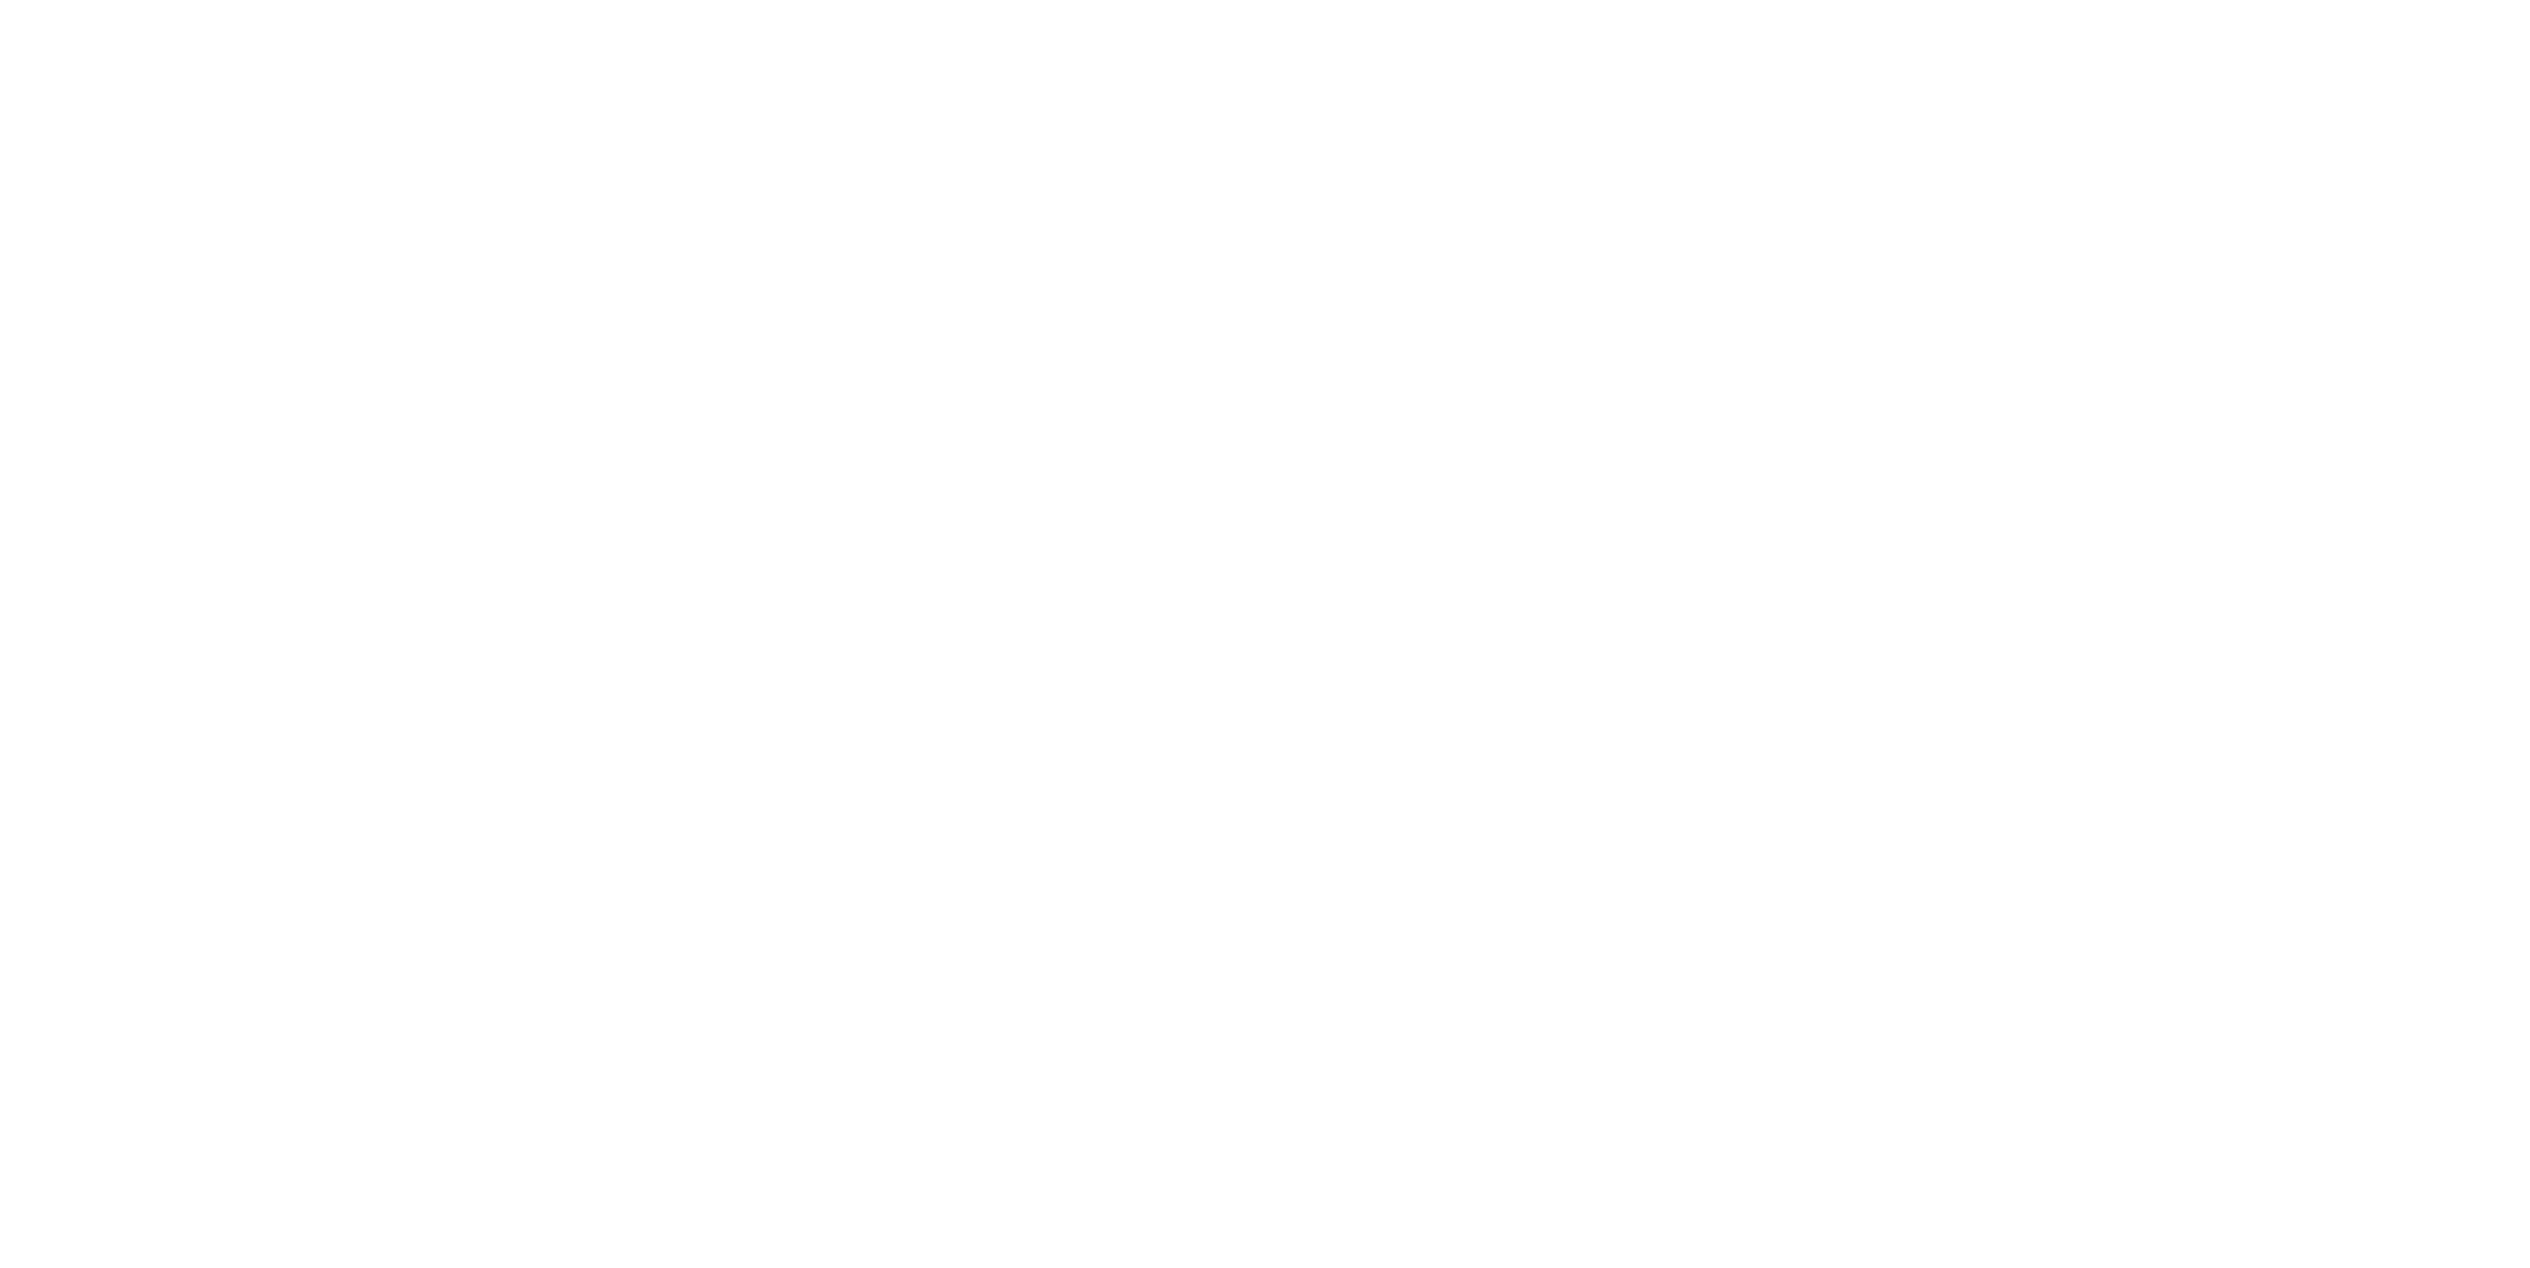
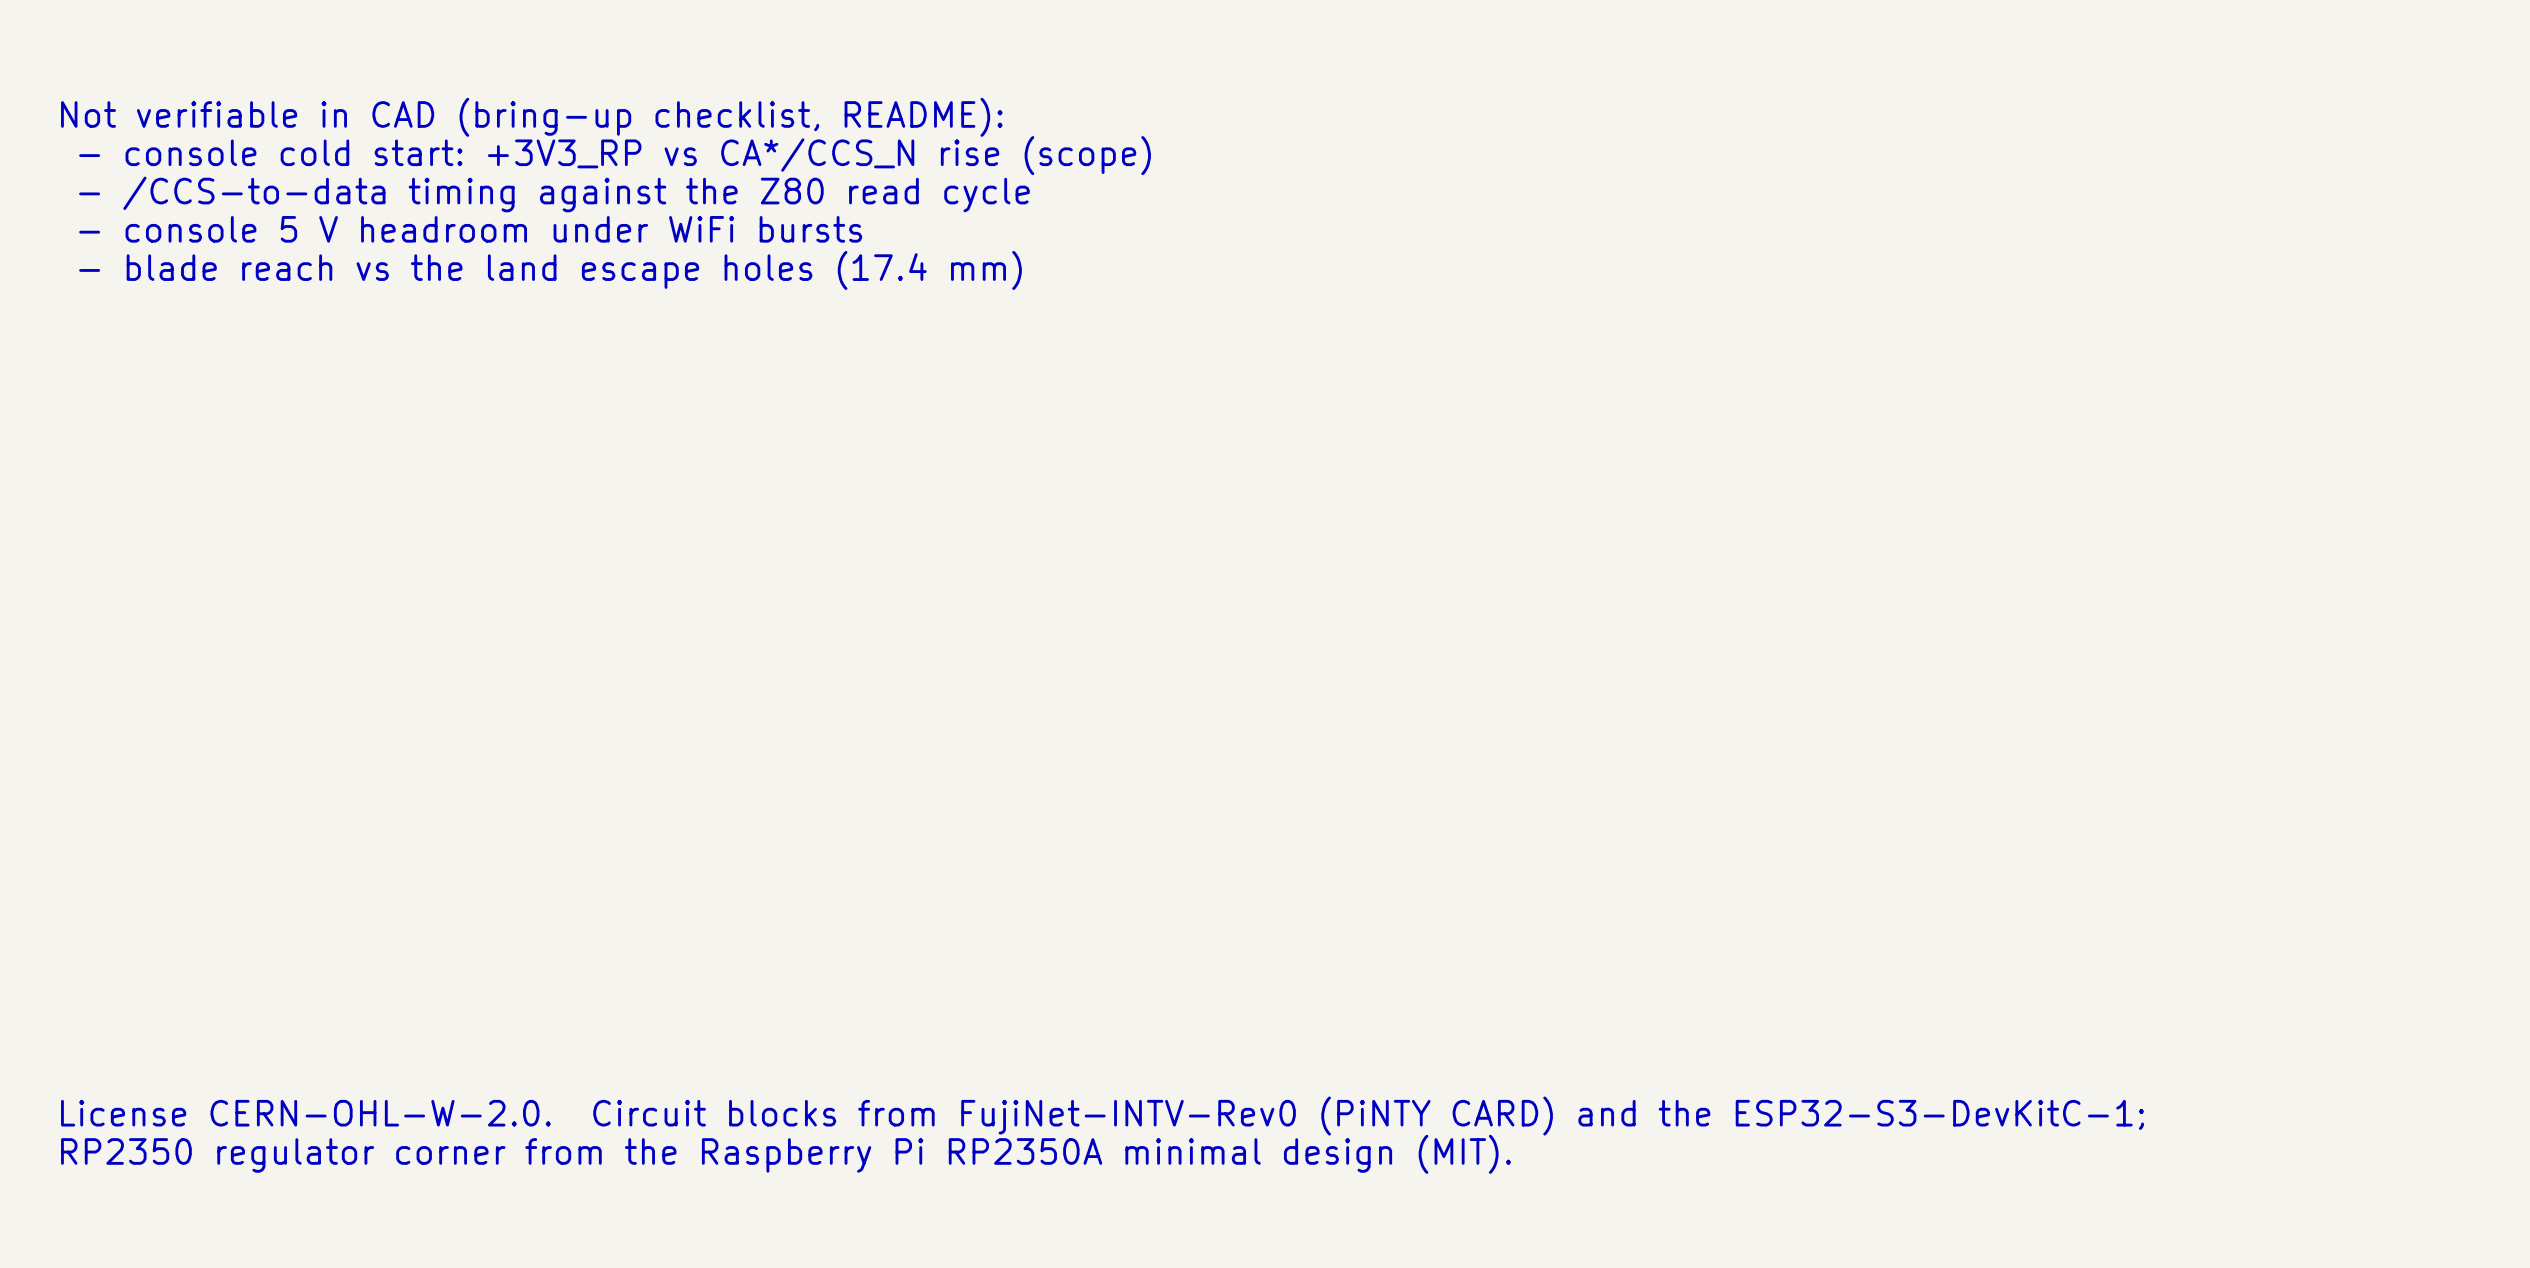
text: none -> Not verifiable in CAD (bring-up checklist, README): (531, 117)
text: none -> - console cold start: +3V3_RP vs CA*/CCS_N rise (scope) (615, 155)
text: none -> - /CCS-to-data timing against the Z80 read cycle (554, 194)
text: none -> - console 5 V headroom under WiFi bursts (470, 229)
text: none -> - blade reach vs the land escape holes (17.4 mm) (550, 270)
text: none -> License CERN-OHL-W-2.0. Circuit blocks from FujiNet-INTV-Rev0 (PiNTY CARD) and the ESP32-S3-DevKitC-1; (1102, 1116)
text: none -> RP2350 regulator corner from the Raspberry Pi RP2350A minimal design (MIT). (786, 1154)

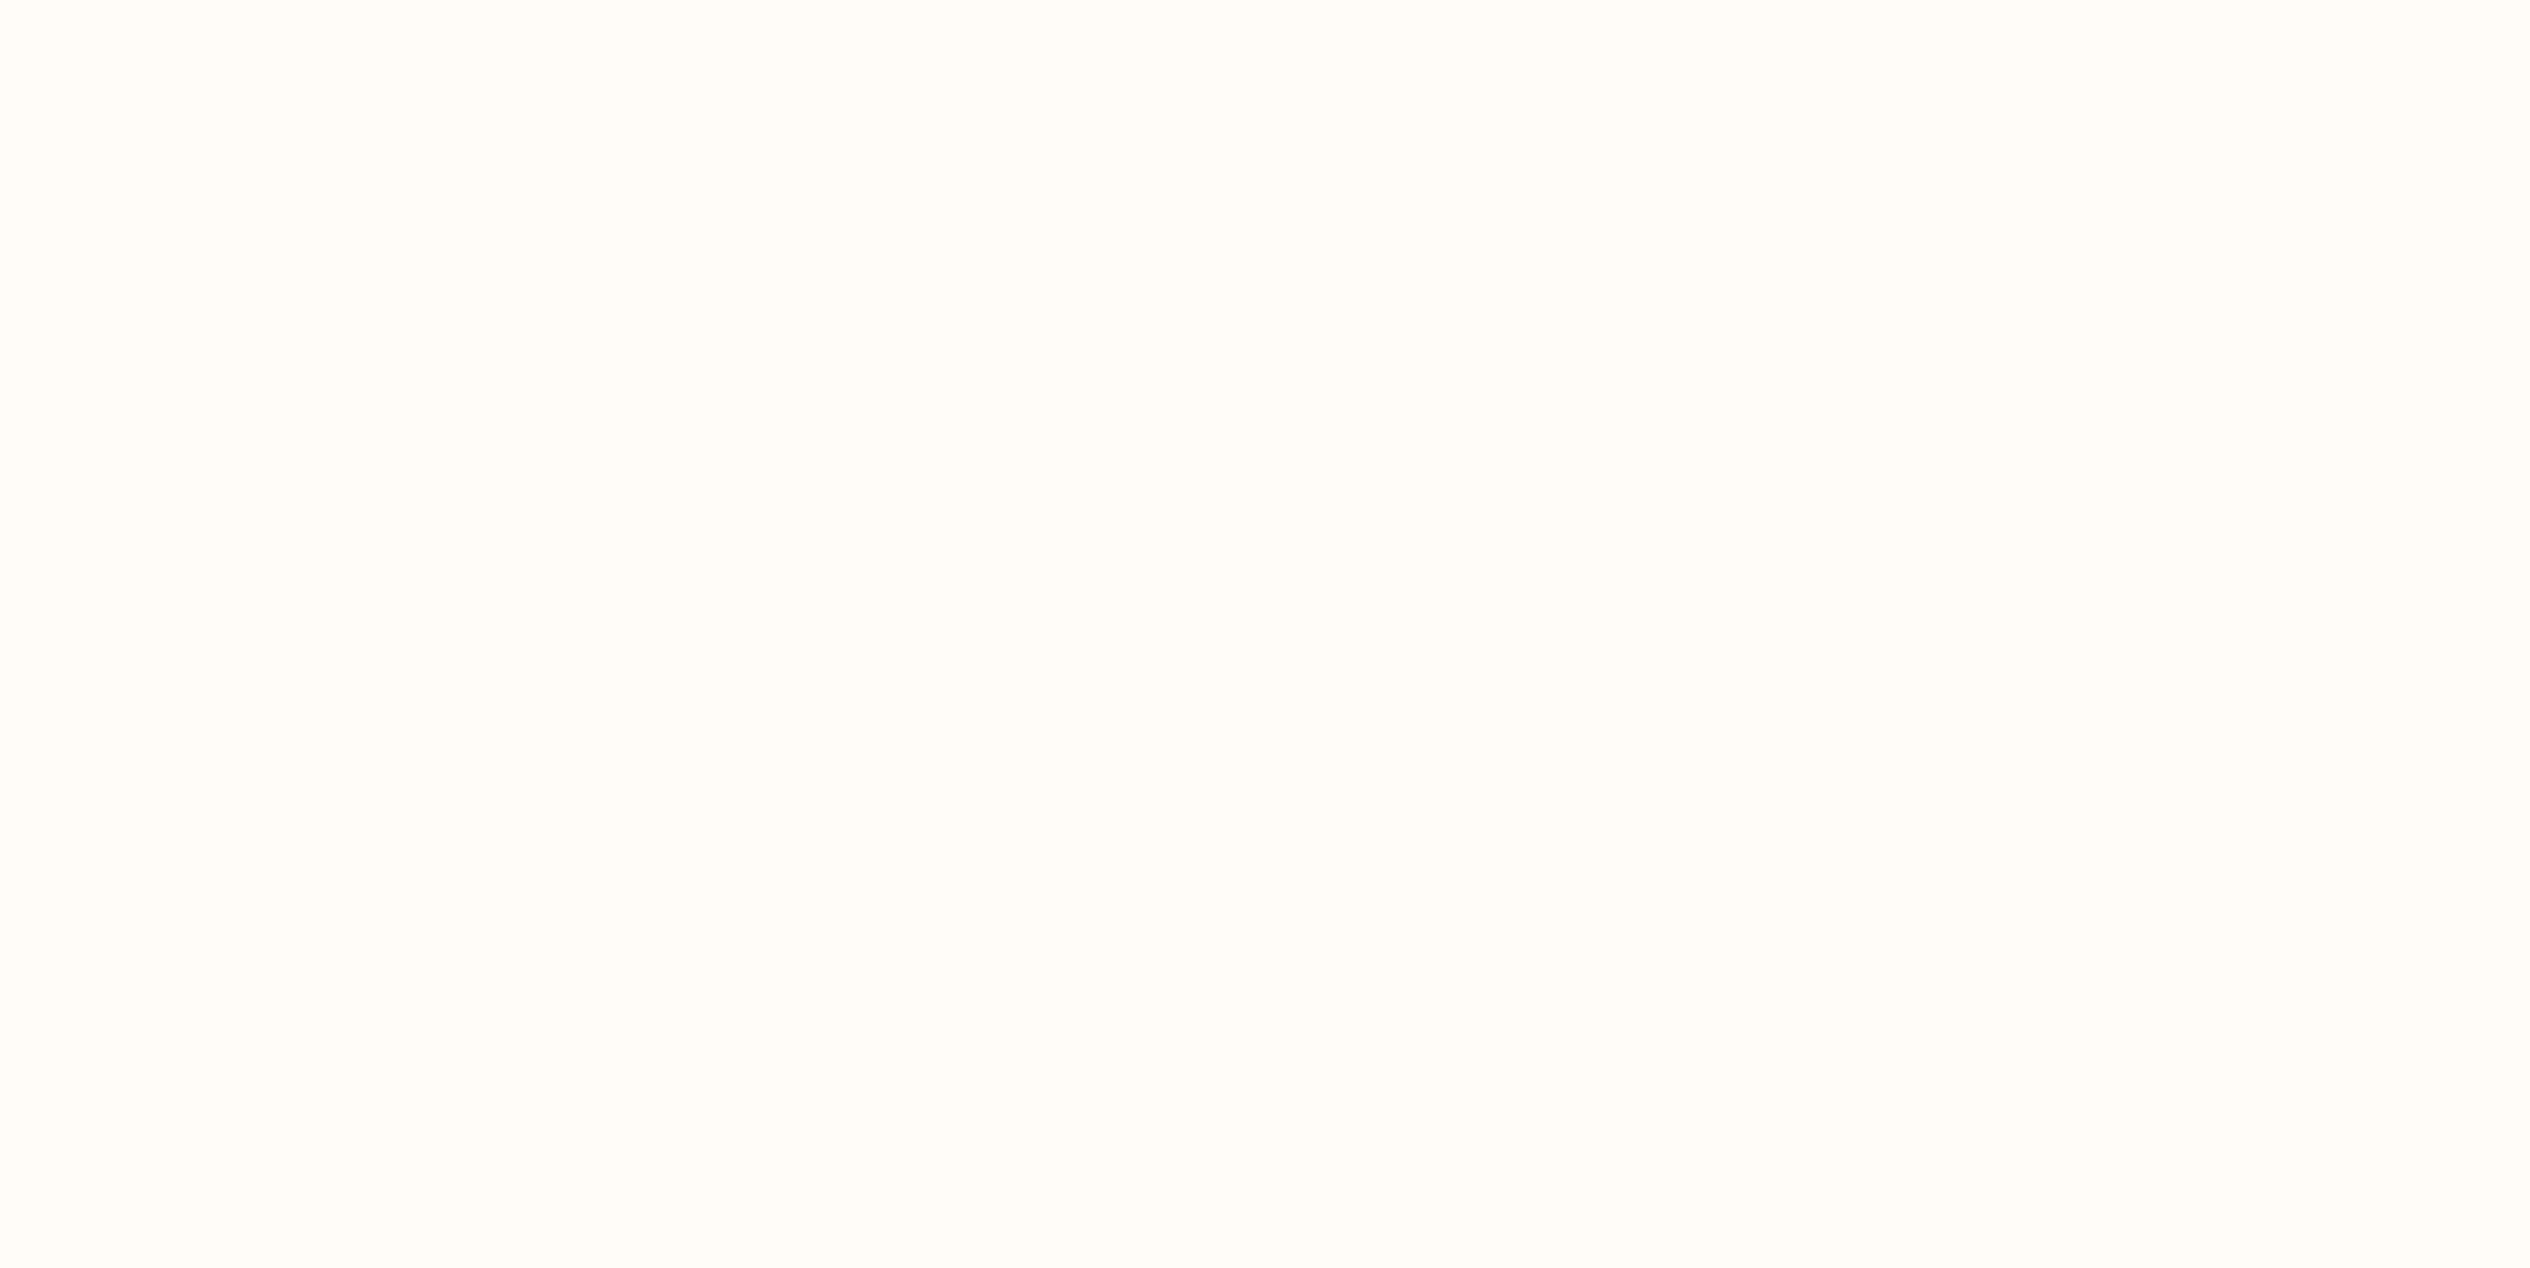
text: Not verifiable in CAD (bring-up checklist, README): (531, 117) -> none
text: - console cold start: +3V3_RP vs CA*/CCS_N rise (scope) (615, 155) -> none
text: - /CCS-to-data timing against the Z80 read cycle (554, 194) -> none
text: - console 5 V headroom under WiFi bursts (470, 229) -> none
text: - blade reach vs the land escape holes (17.4 mm) (550, 270) -> none
text: License CERN-OHL-W-2.0. Circuit blocks from FujiNet-INTV-Rev0 (PiNTY CARD) and the ESP32-S3-DevKitC-1; (1102, 1116) -> none
text: RP2350 regulator corner from the Raspberry Pi RP2350A minimal design (MIT). (786, 1154) -> none

